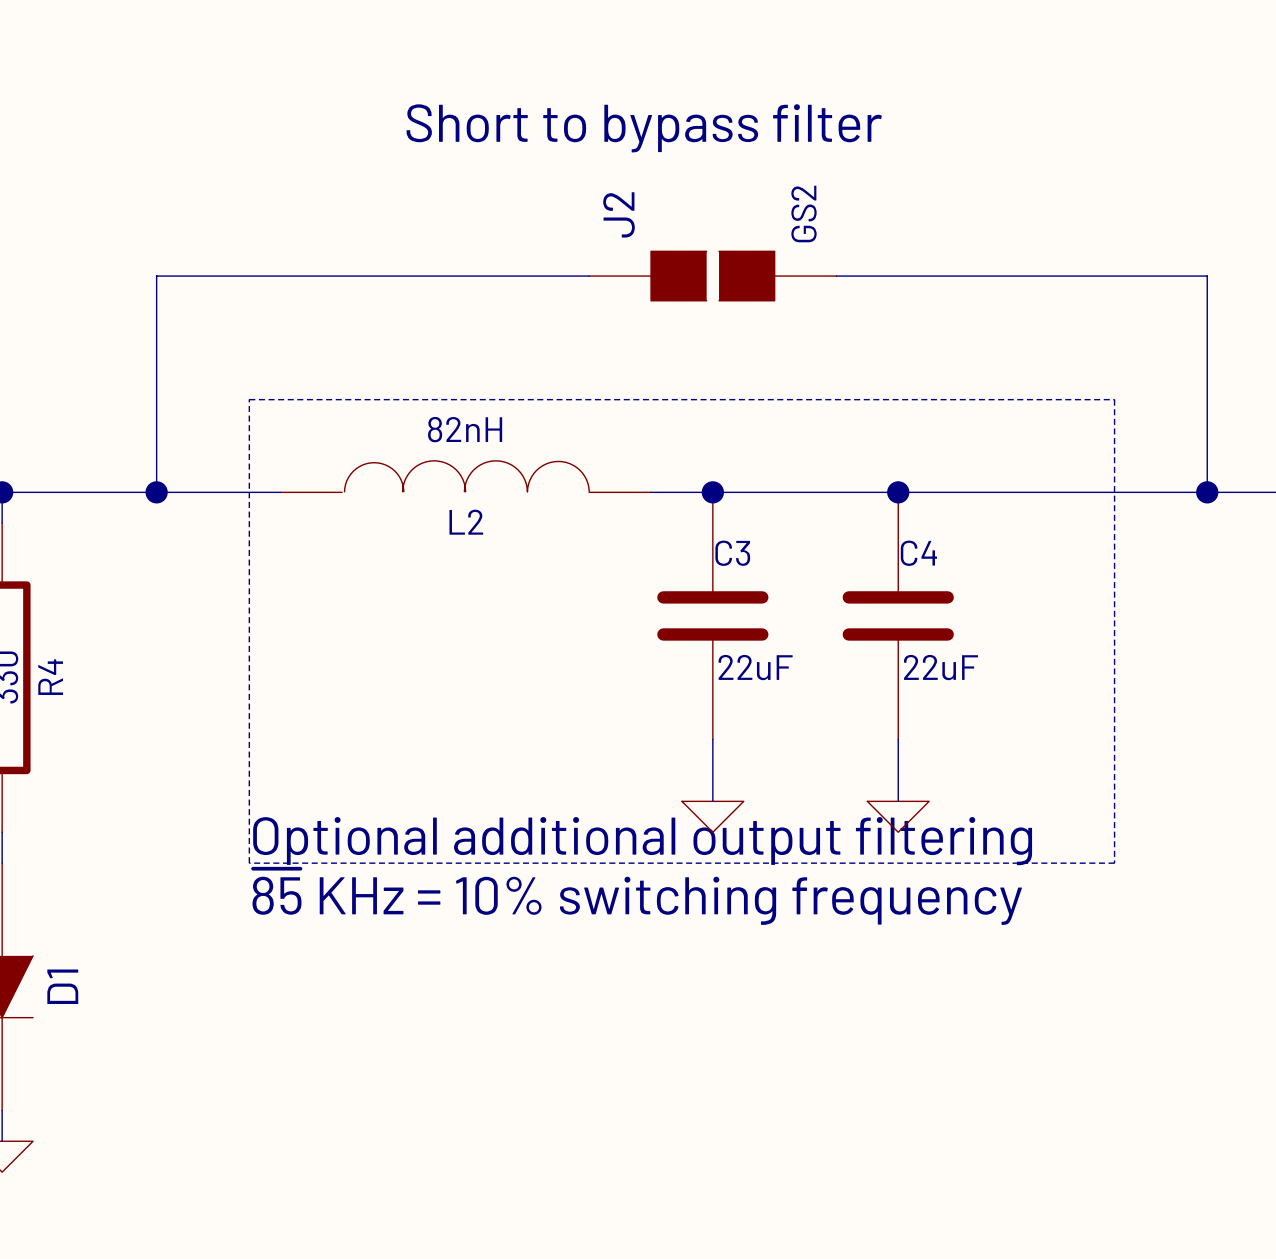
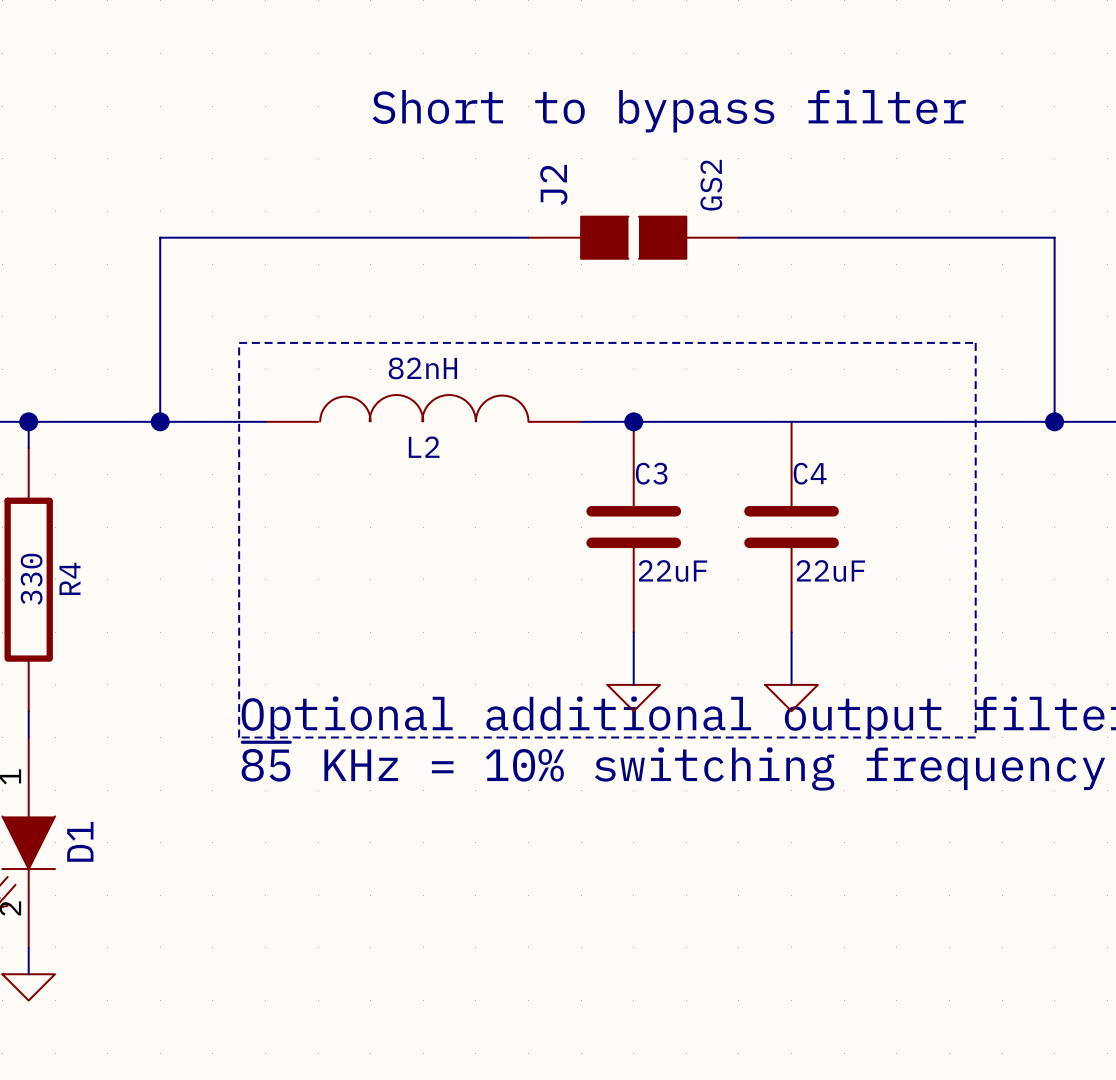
junction: (898, 492) -> none

